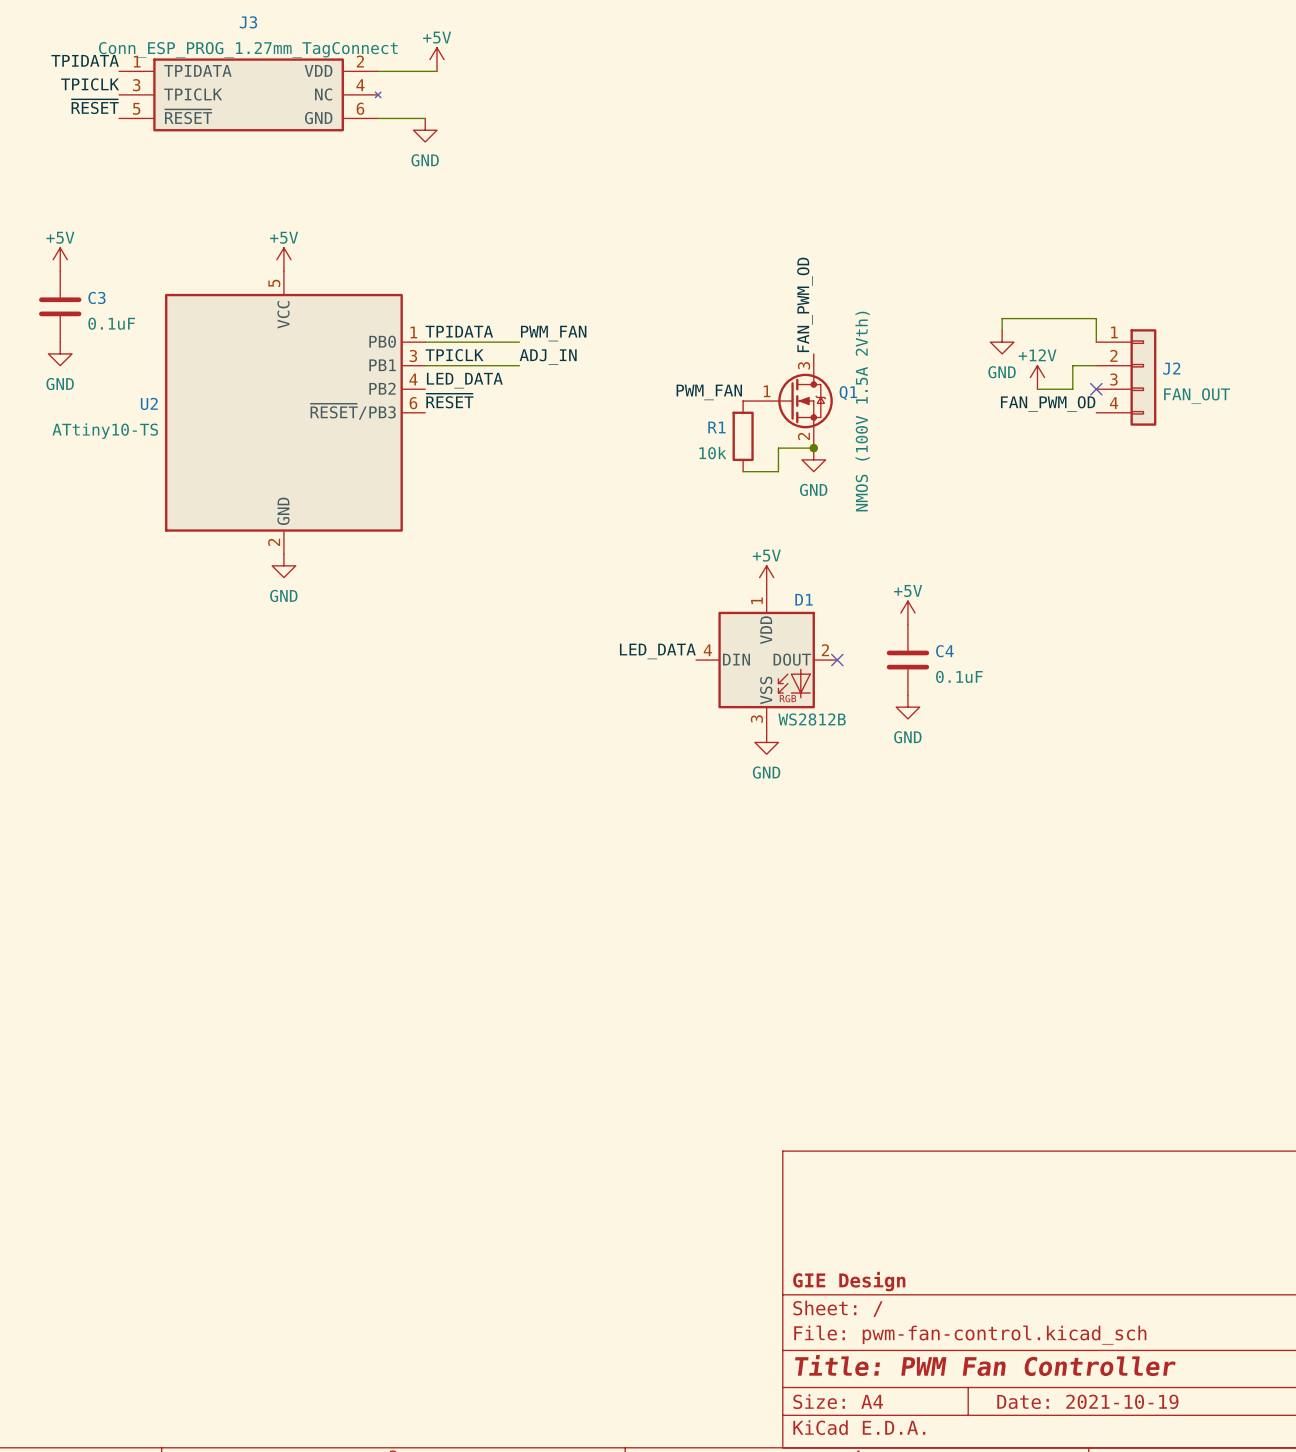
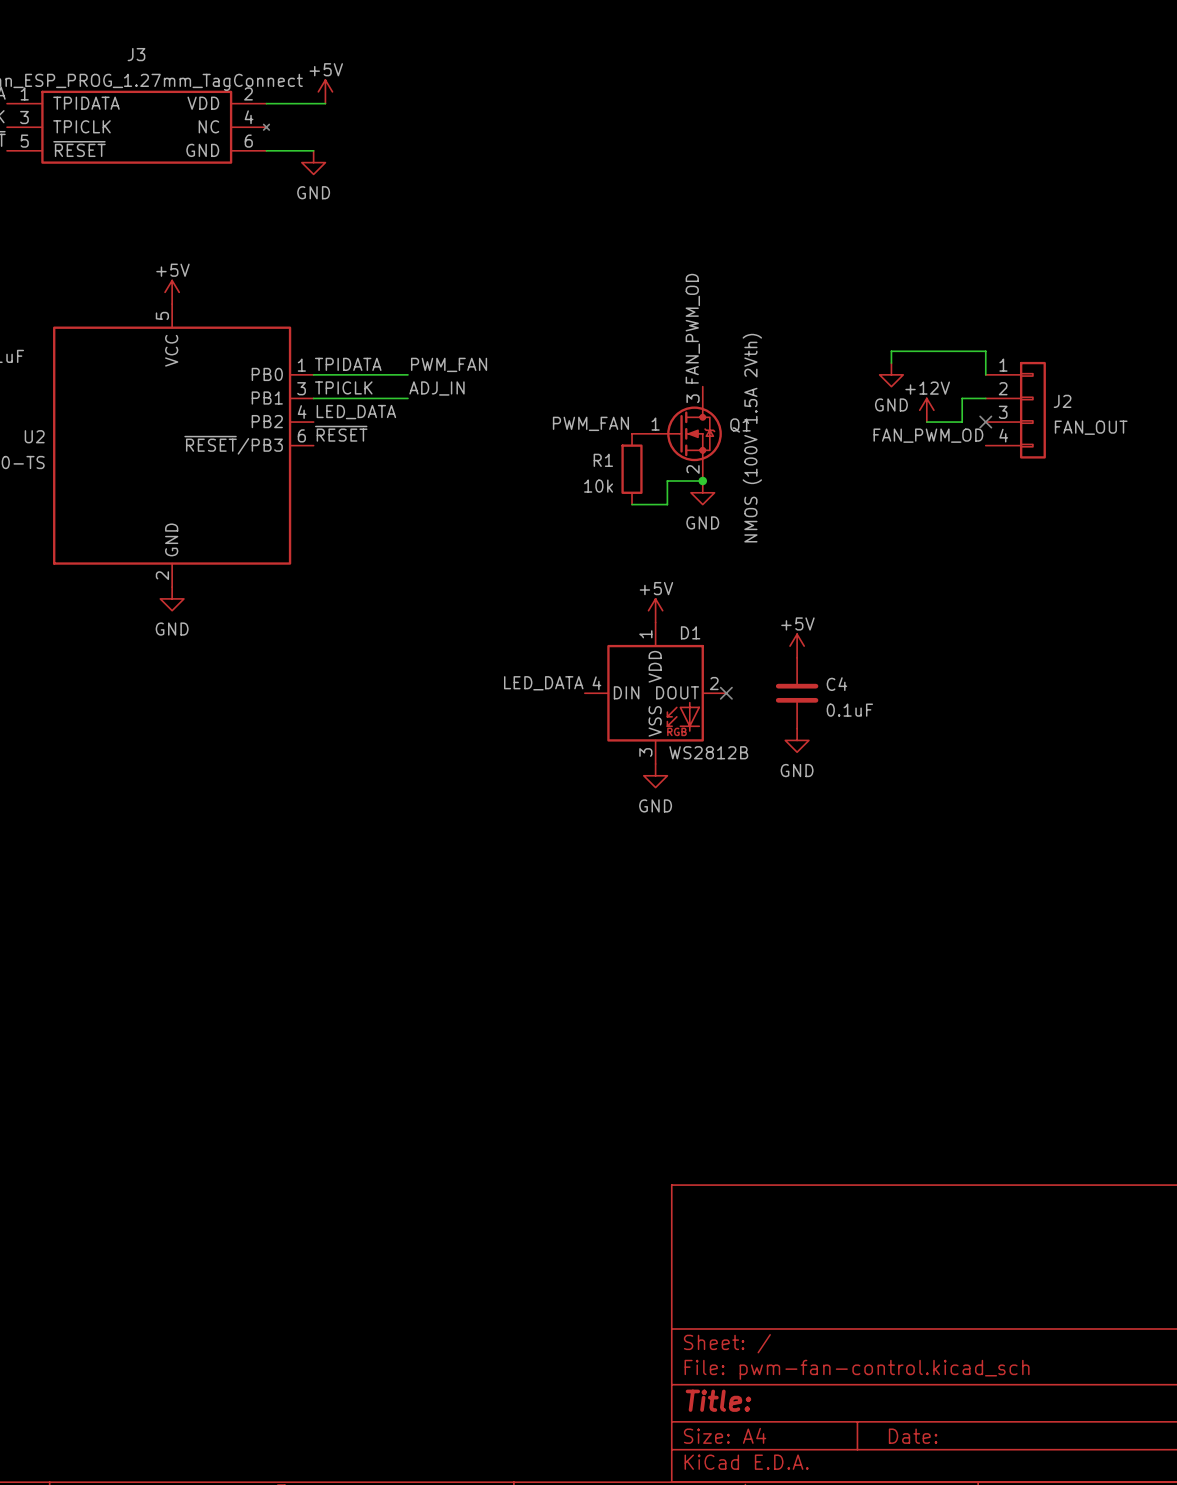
title block: GIE Design (849, 1281) -> none
title block: Title: PWM Fan Controller (985, 1365) -> Title: (718, 1400)
title block: Date: 2021-10-19 (1087, 1401) -> Date: (913, 1436)

